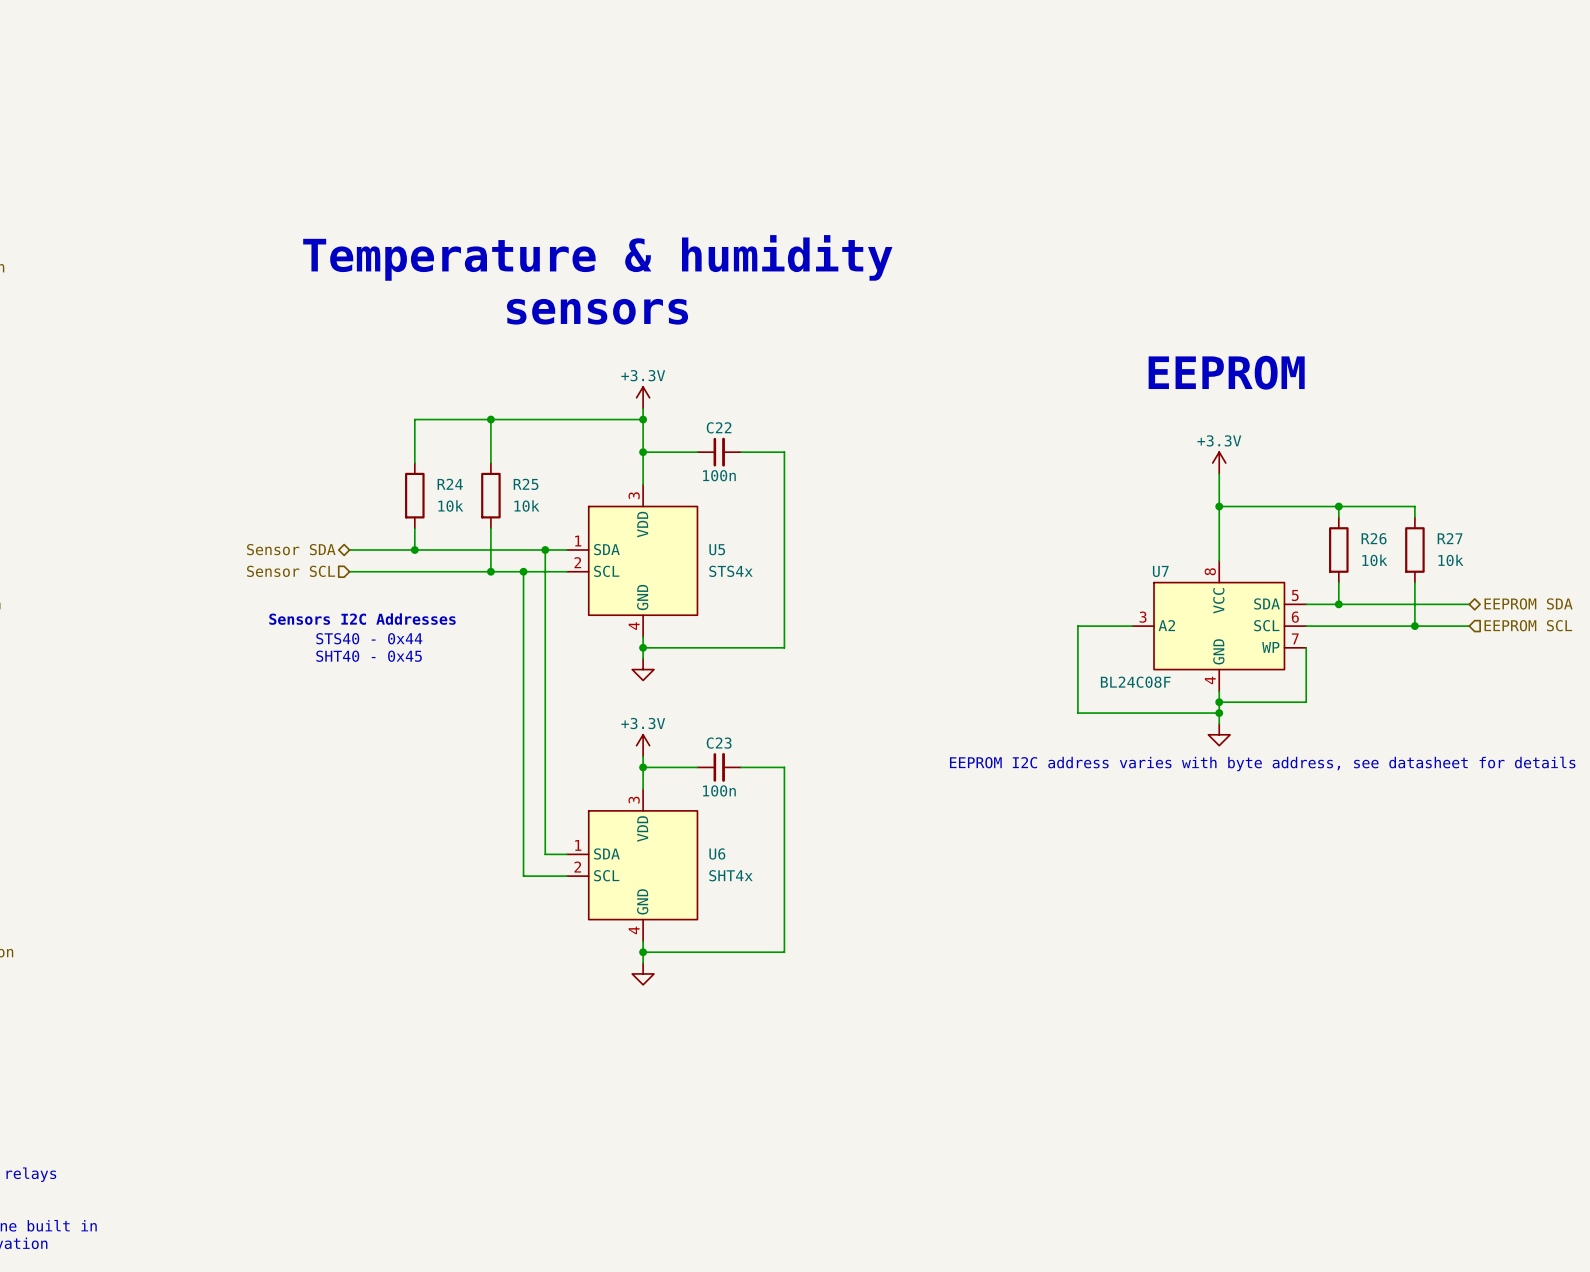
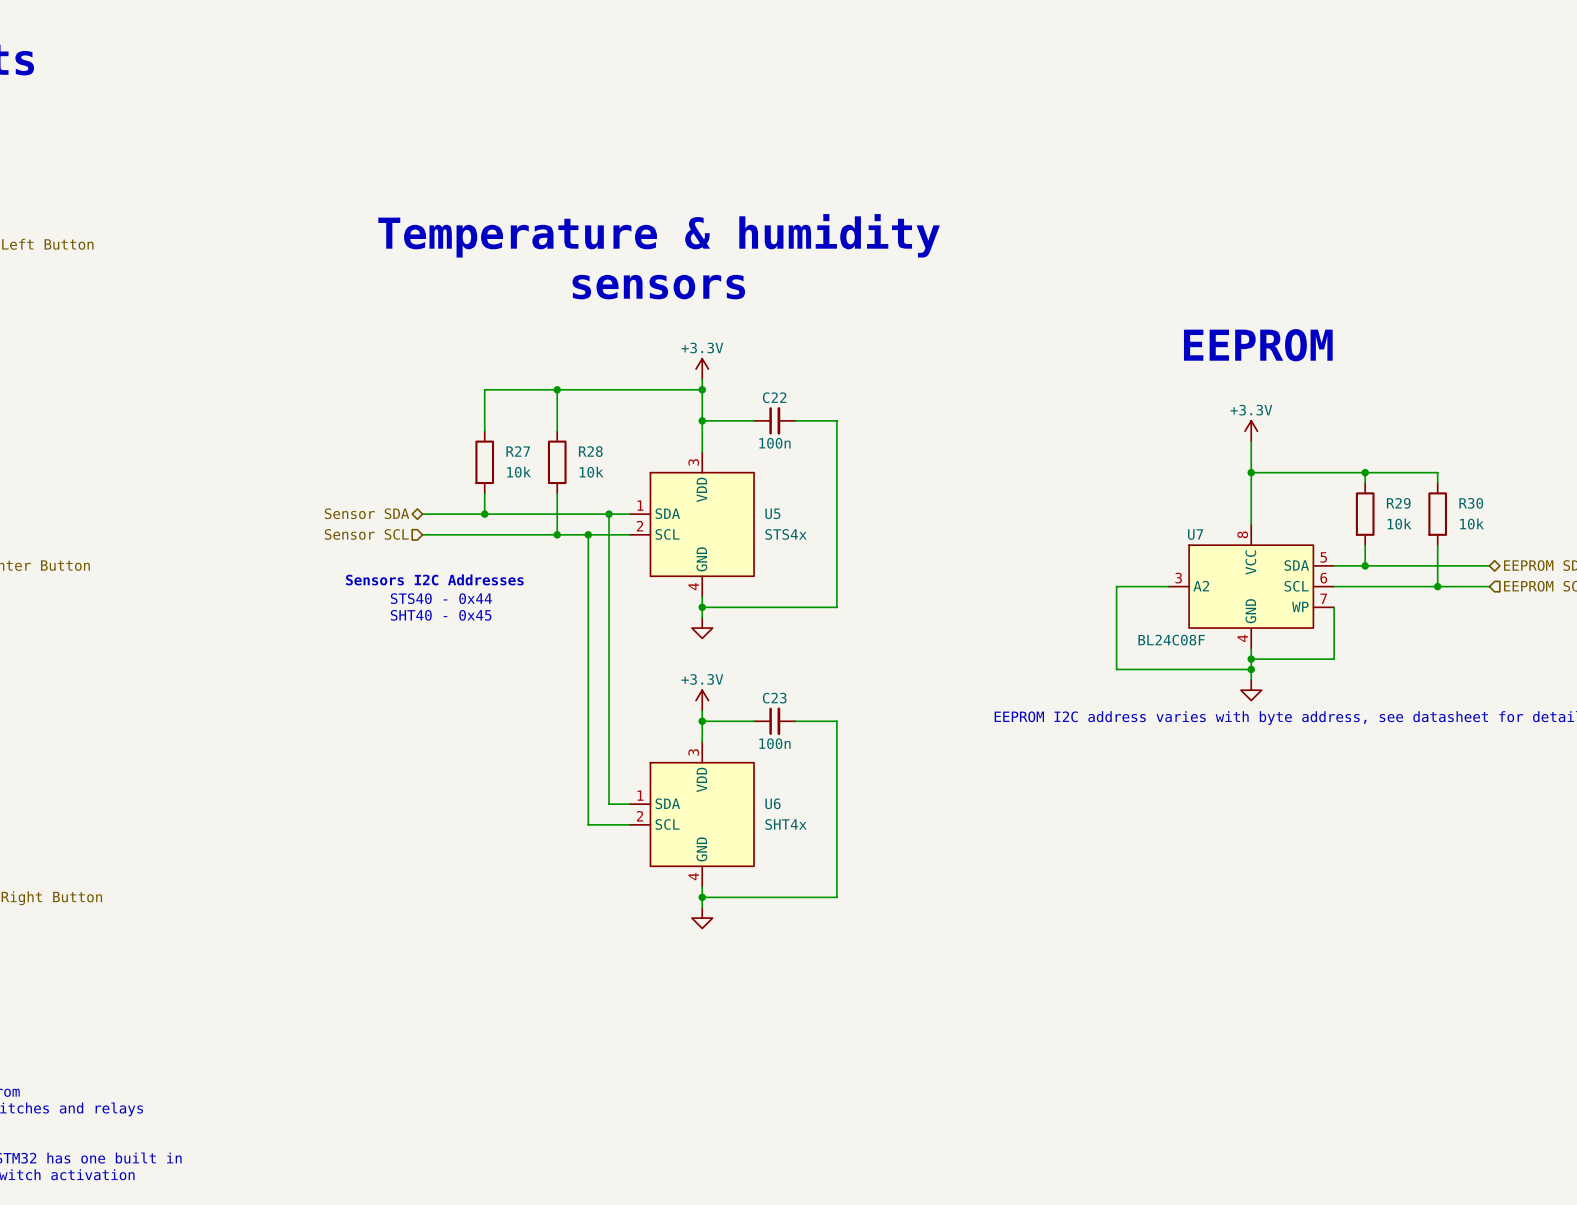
R24 name: R24 (450, 484) -> R27 (518, 451)
R25 name: R25 (526, 484) -> R28 (590, 451)
R26 name: R26 (1374, 538) -> R29 (1398, 503)
R27 name: R27 (1450, 538) -> R30 (1471, 503)

